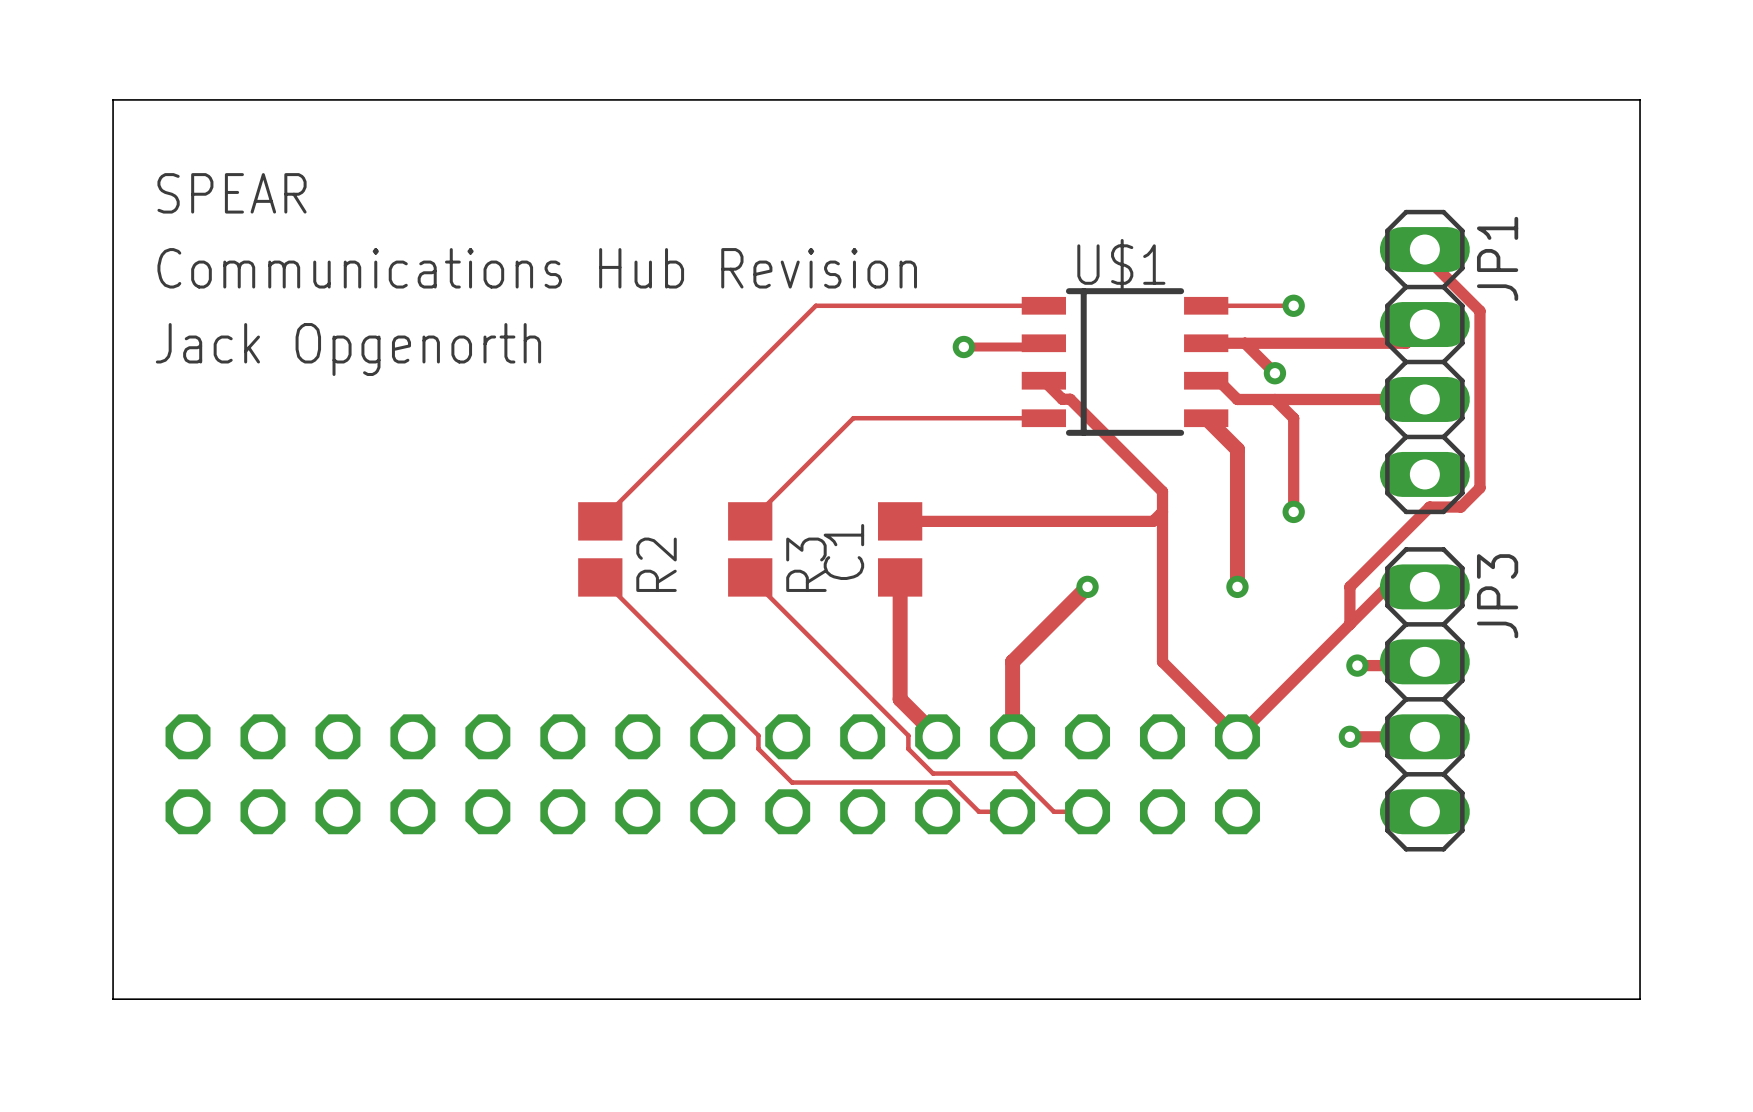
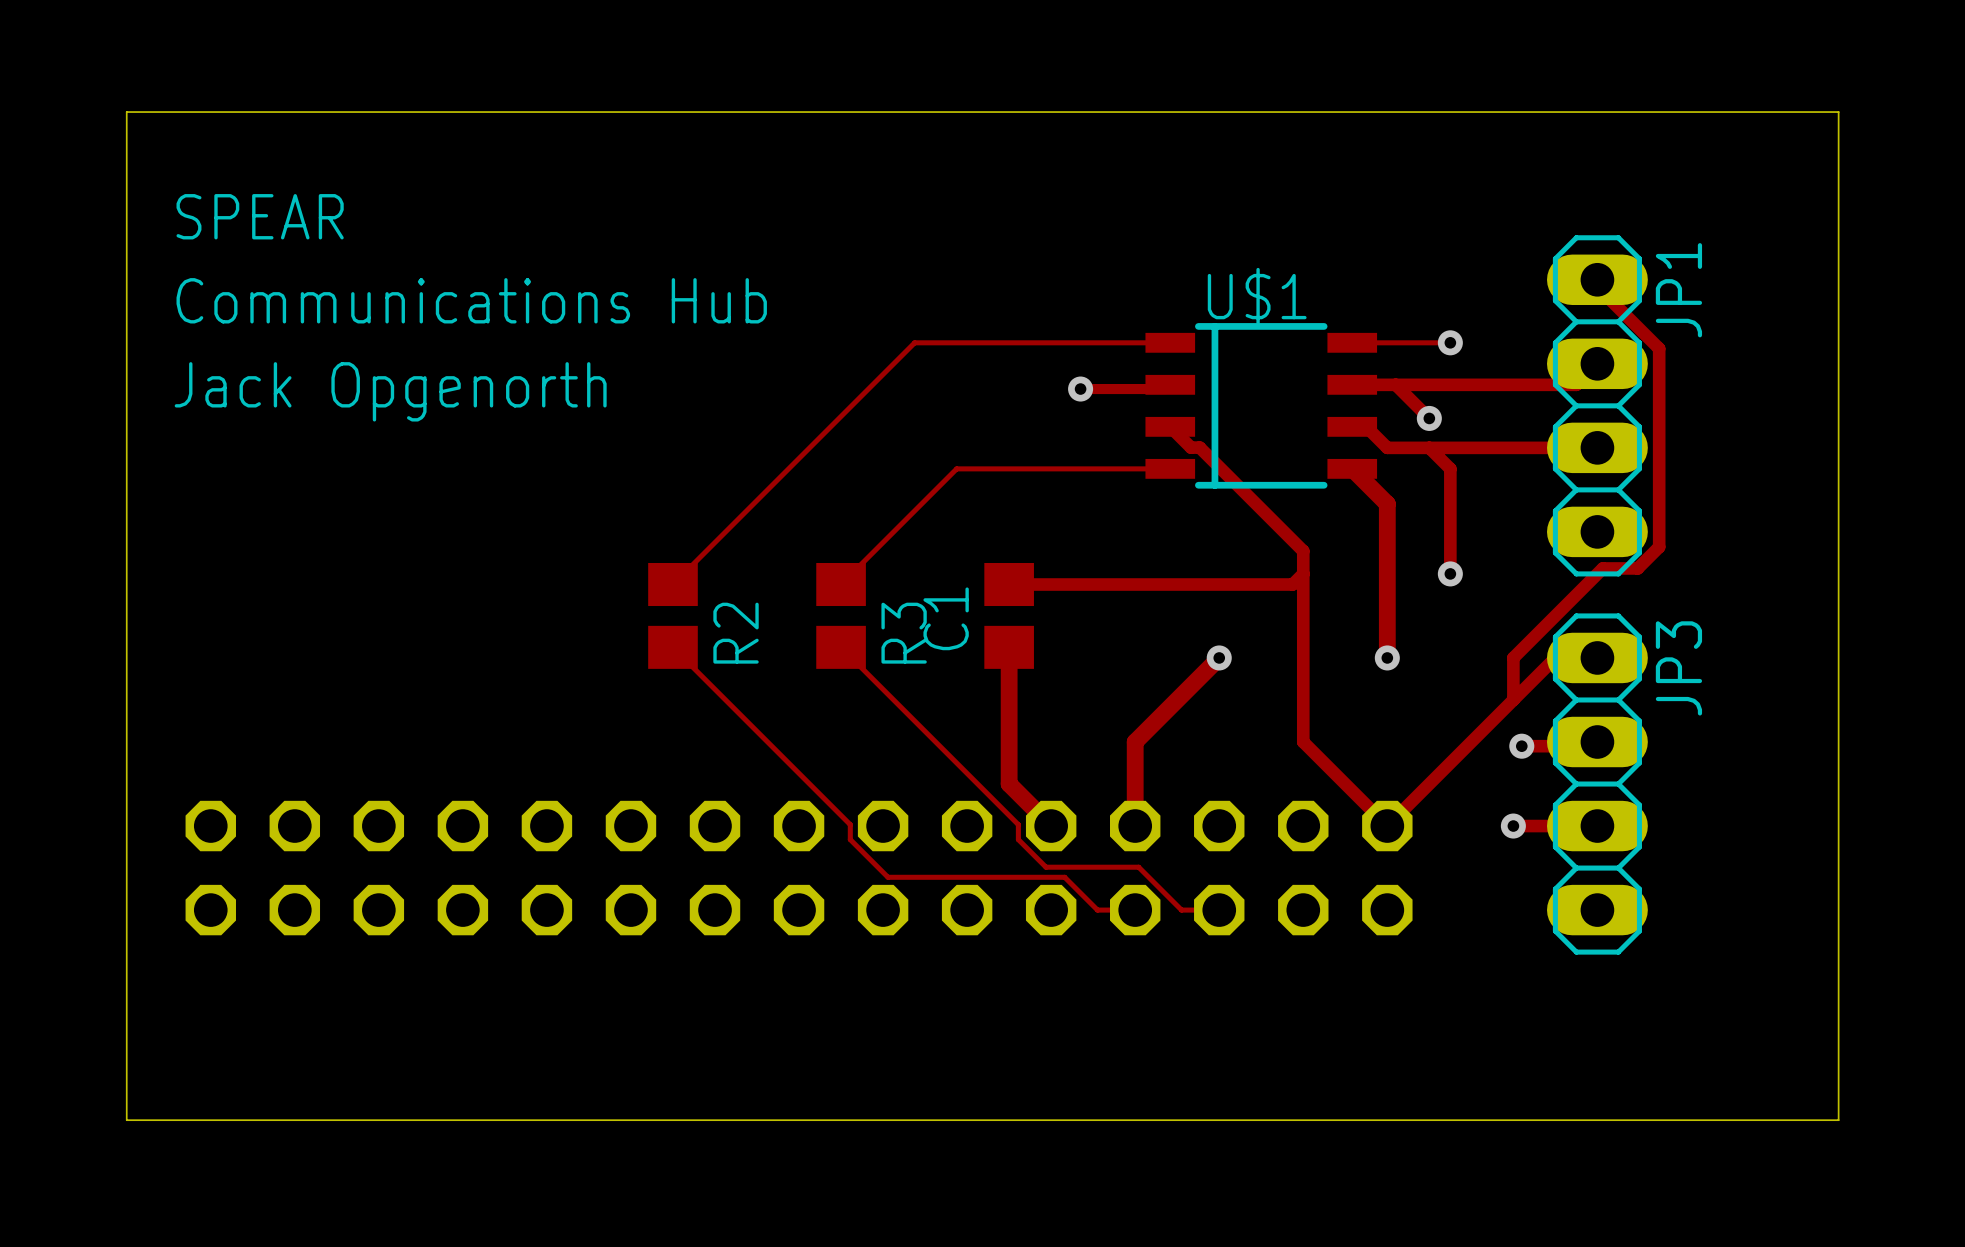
text: Communications Hub Revision (537, 268) -> Communications Hub (471, 300)

